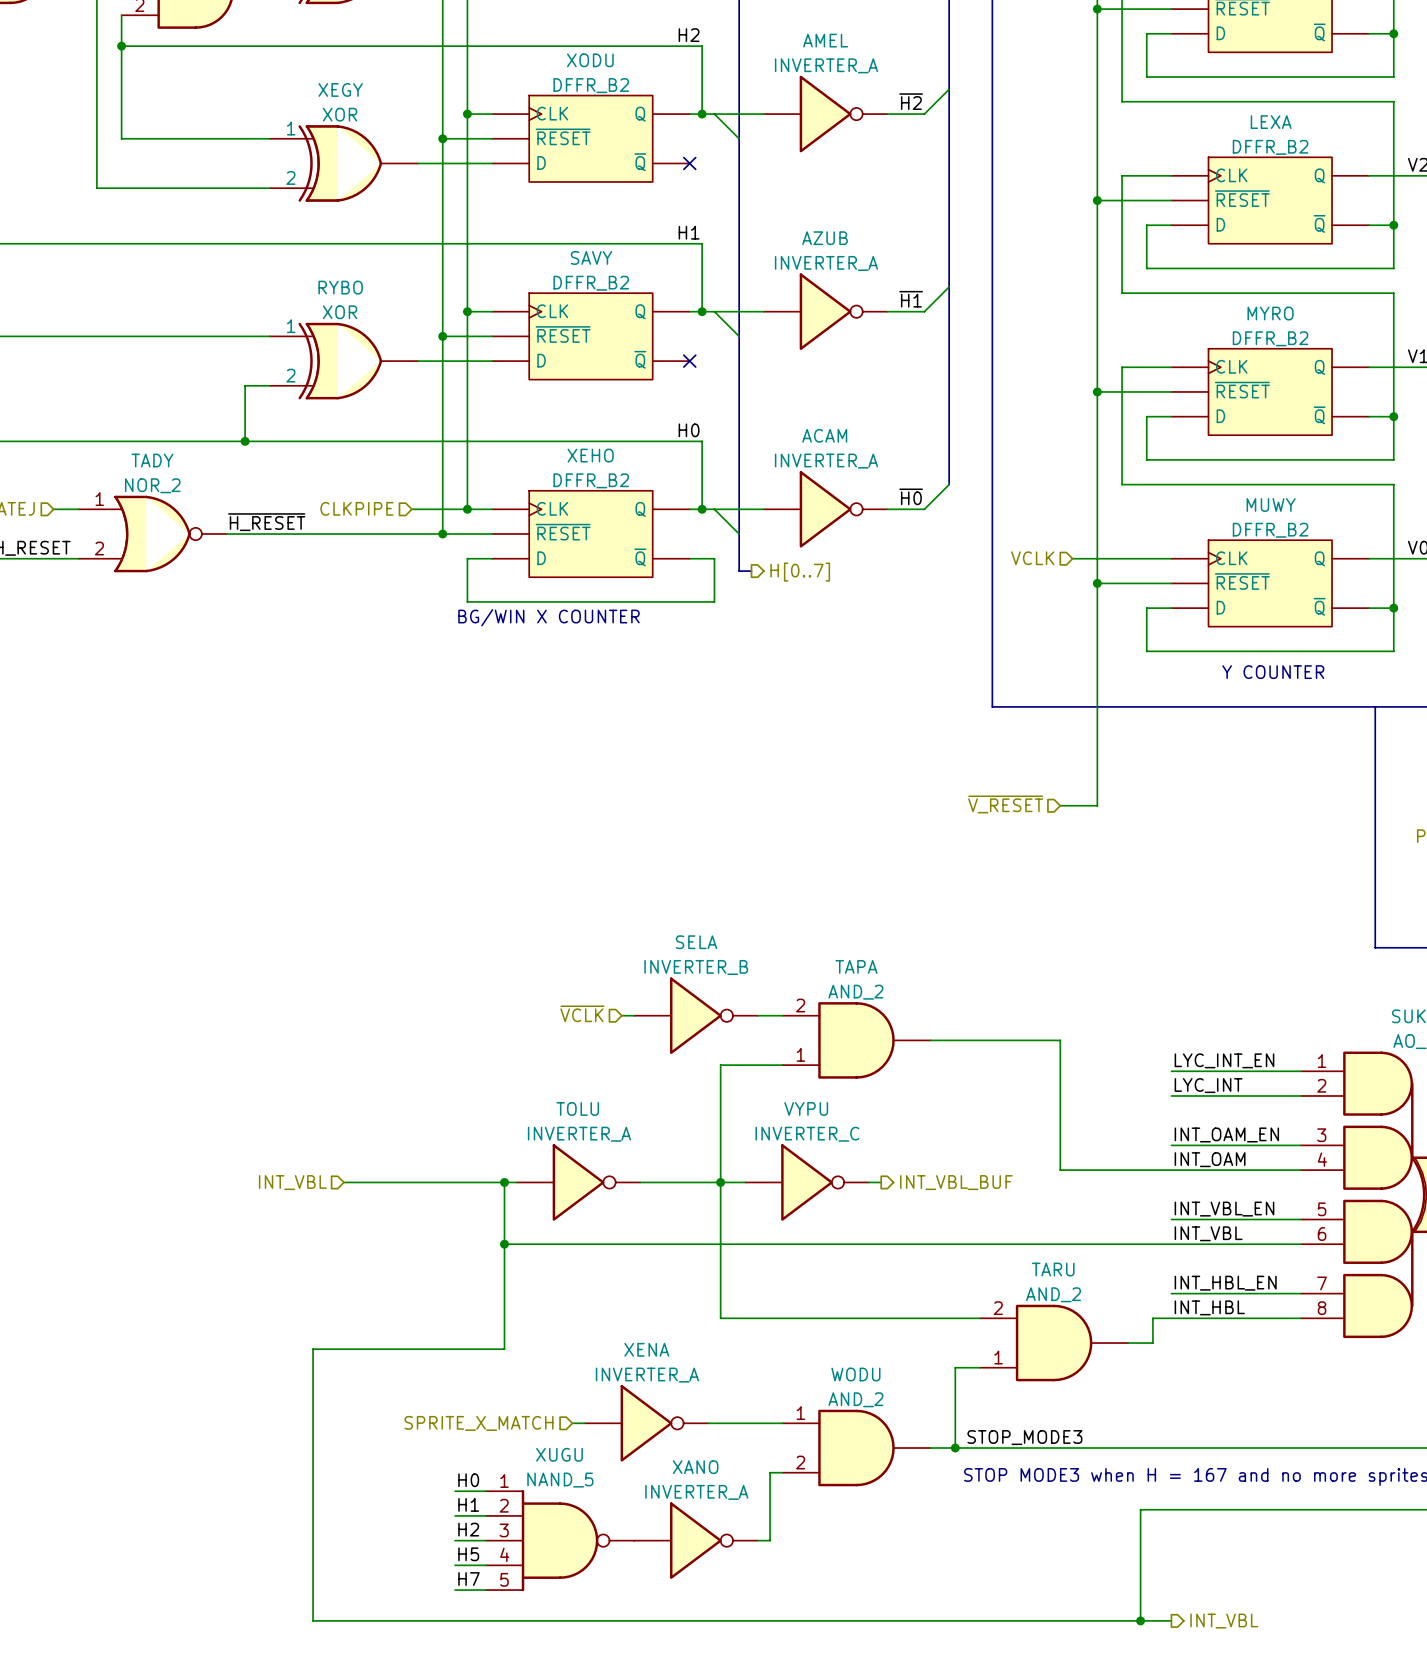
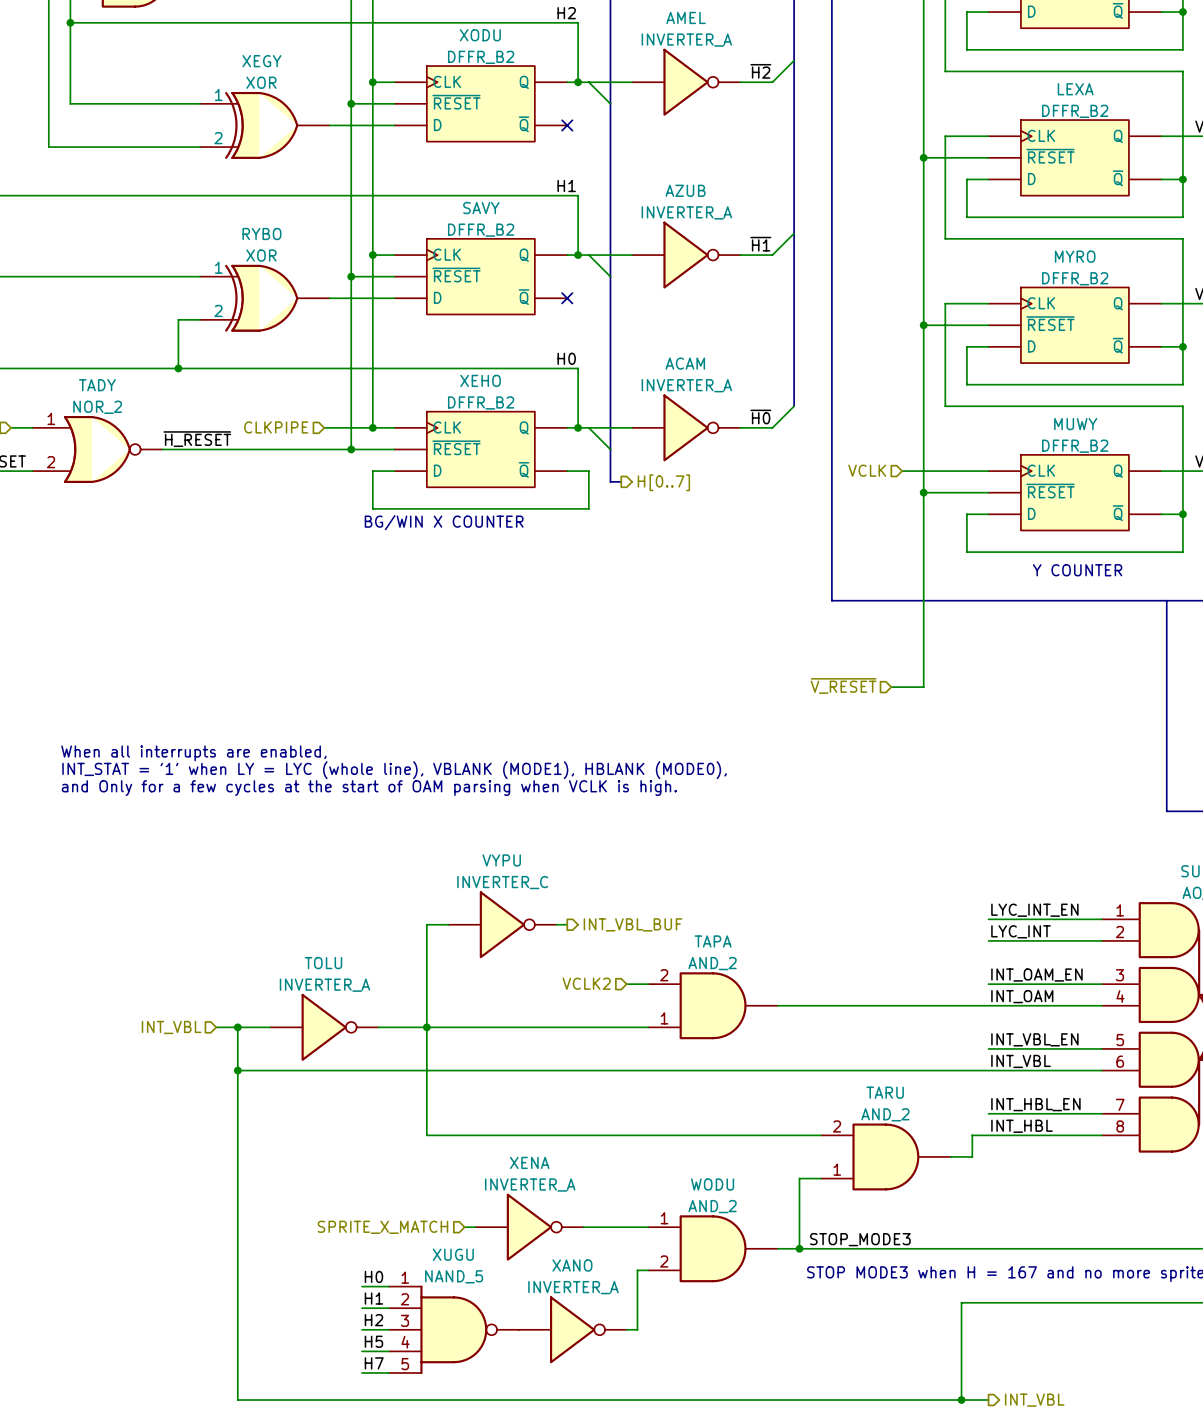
text: none -> When all interrupts are enabled, (193, 753)
text: none -> INT_STAT = '1' when LY = LYC (whole line), VBLANK (MODE1), HBLANK (MODE0), (394, 770)
text: none -> and Only for a few cycles at the start of OAM parsing when VCLK is high. (369, 788)
hierarchical label: ~{VCLK} (582, 1013) -> none
wire: (621, 1015) (634, 1015) -> (556, 924) (567, 924)
SELA: INVERTER_B (695, 1015) -> none
wire: (757, 1015) (782, 1015) -> (626, 984) (648, 984)
TAPA position: (856, 1040) -> (713, 1005)
wire: (930, 1040) (1060, 1040) (1060, 1170) -> (777, 1005) (891, 1005)
wire: (782, 1065) (720, 1065) (720, 1318) -> (448, 924) (426, 924) (426, 1135) (594, 1135)
hierarchical label: none -> VCLK2 (586, 983)
hierarchical label position: INT_VBL (292, 1182) -> INT_VBL (171, 1027)
wire: (343, 1182) (516, 1182) -> none
wire: (504, 1182) (504, 1349) (313, 1349) -> (237, 1027) (237, 1162)
junction: (504, 1182) -> none
TOLU position: (578, 1182) -> (324, 1027)
wire: (640, 1182) (745, 1182) -> none
junction: (720, 1182) -> none
VYPU position: (807, 1182) -> (502, 924)
hierarchical label position: INT_VBL_BUF (956, 1182) -> INT_VBL_BUF (633, 924)
wire: none -> (216, 1027) (270, 1027)
junction: none -> (237, 1027)
wire: none -> (378, 1027) (648, 1027)
junction: none -> (426, 1027)
wire: none -> (237, 1070) (405, 1070)
junction: none -> (237, 1070)
junction: (504, 1244) -> none

